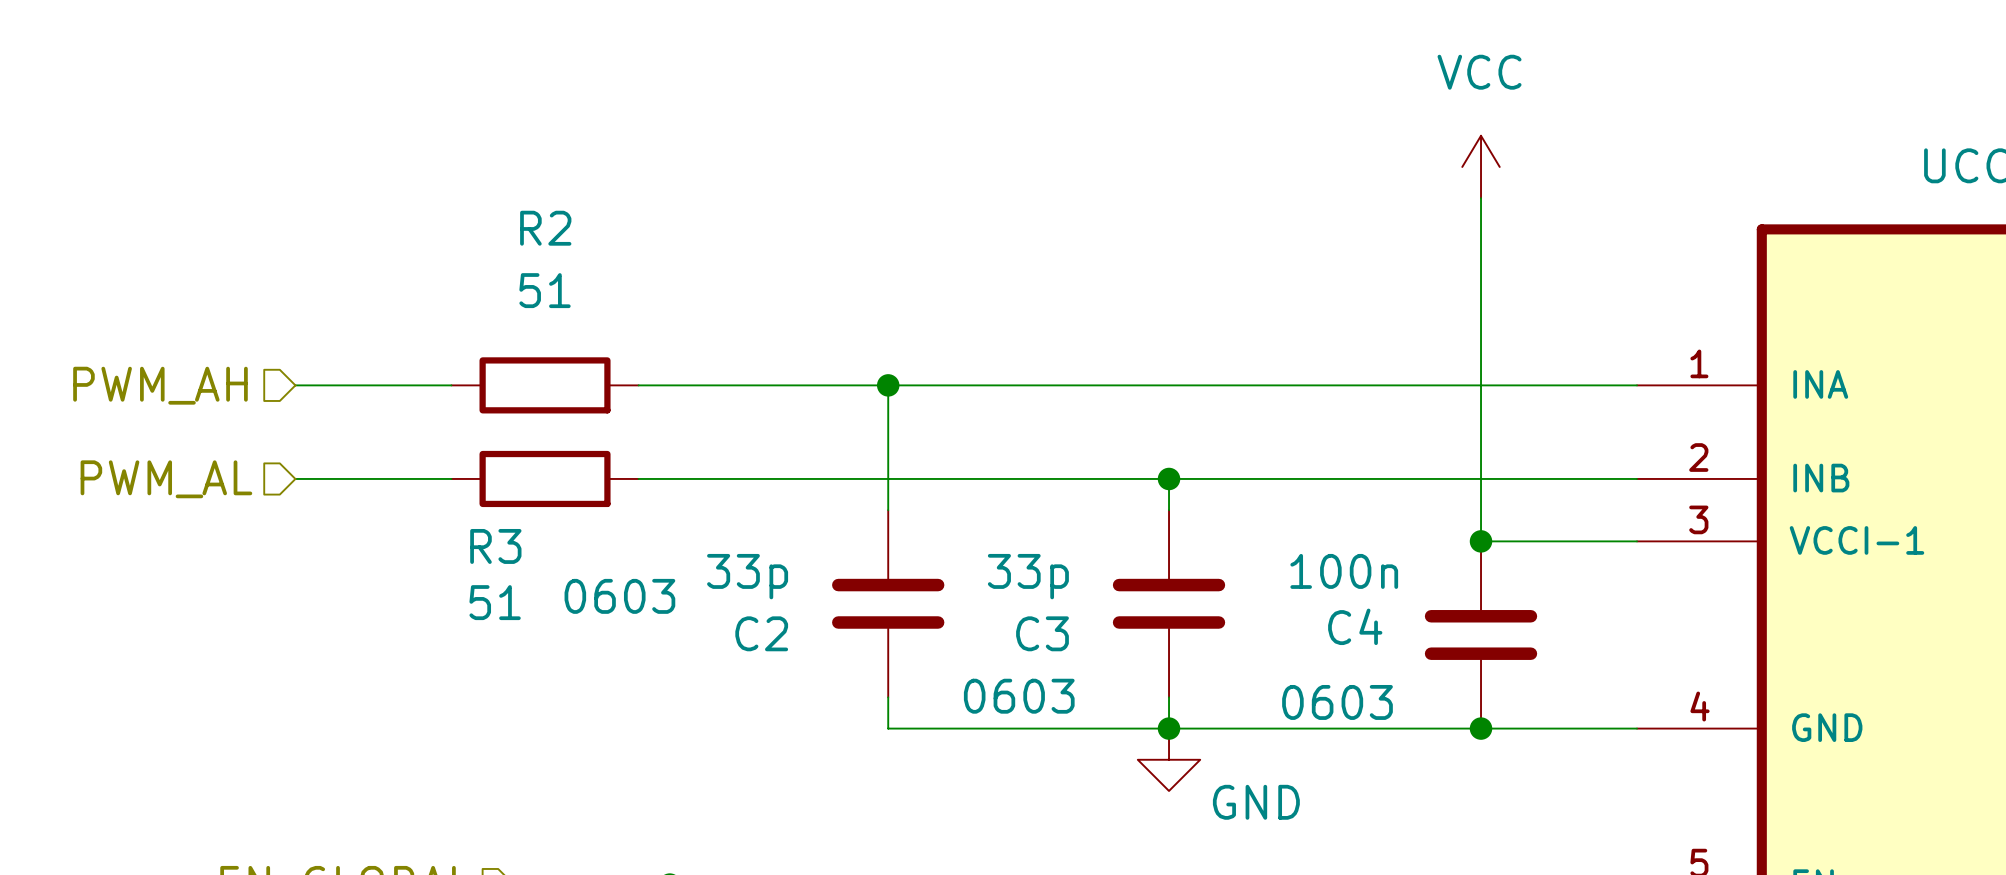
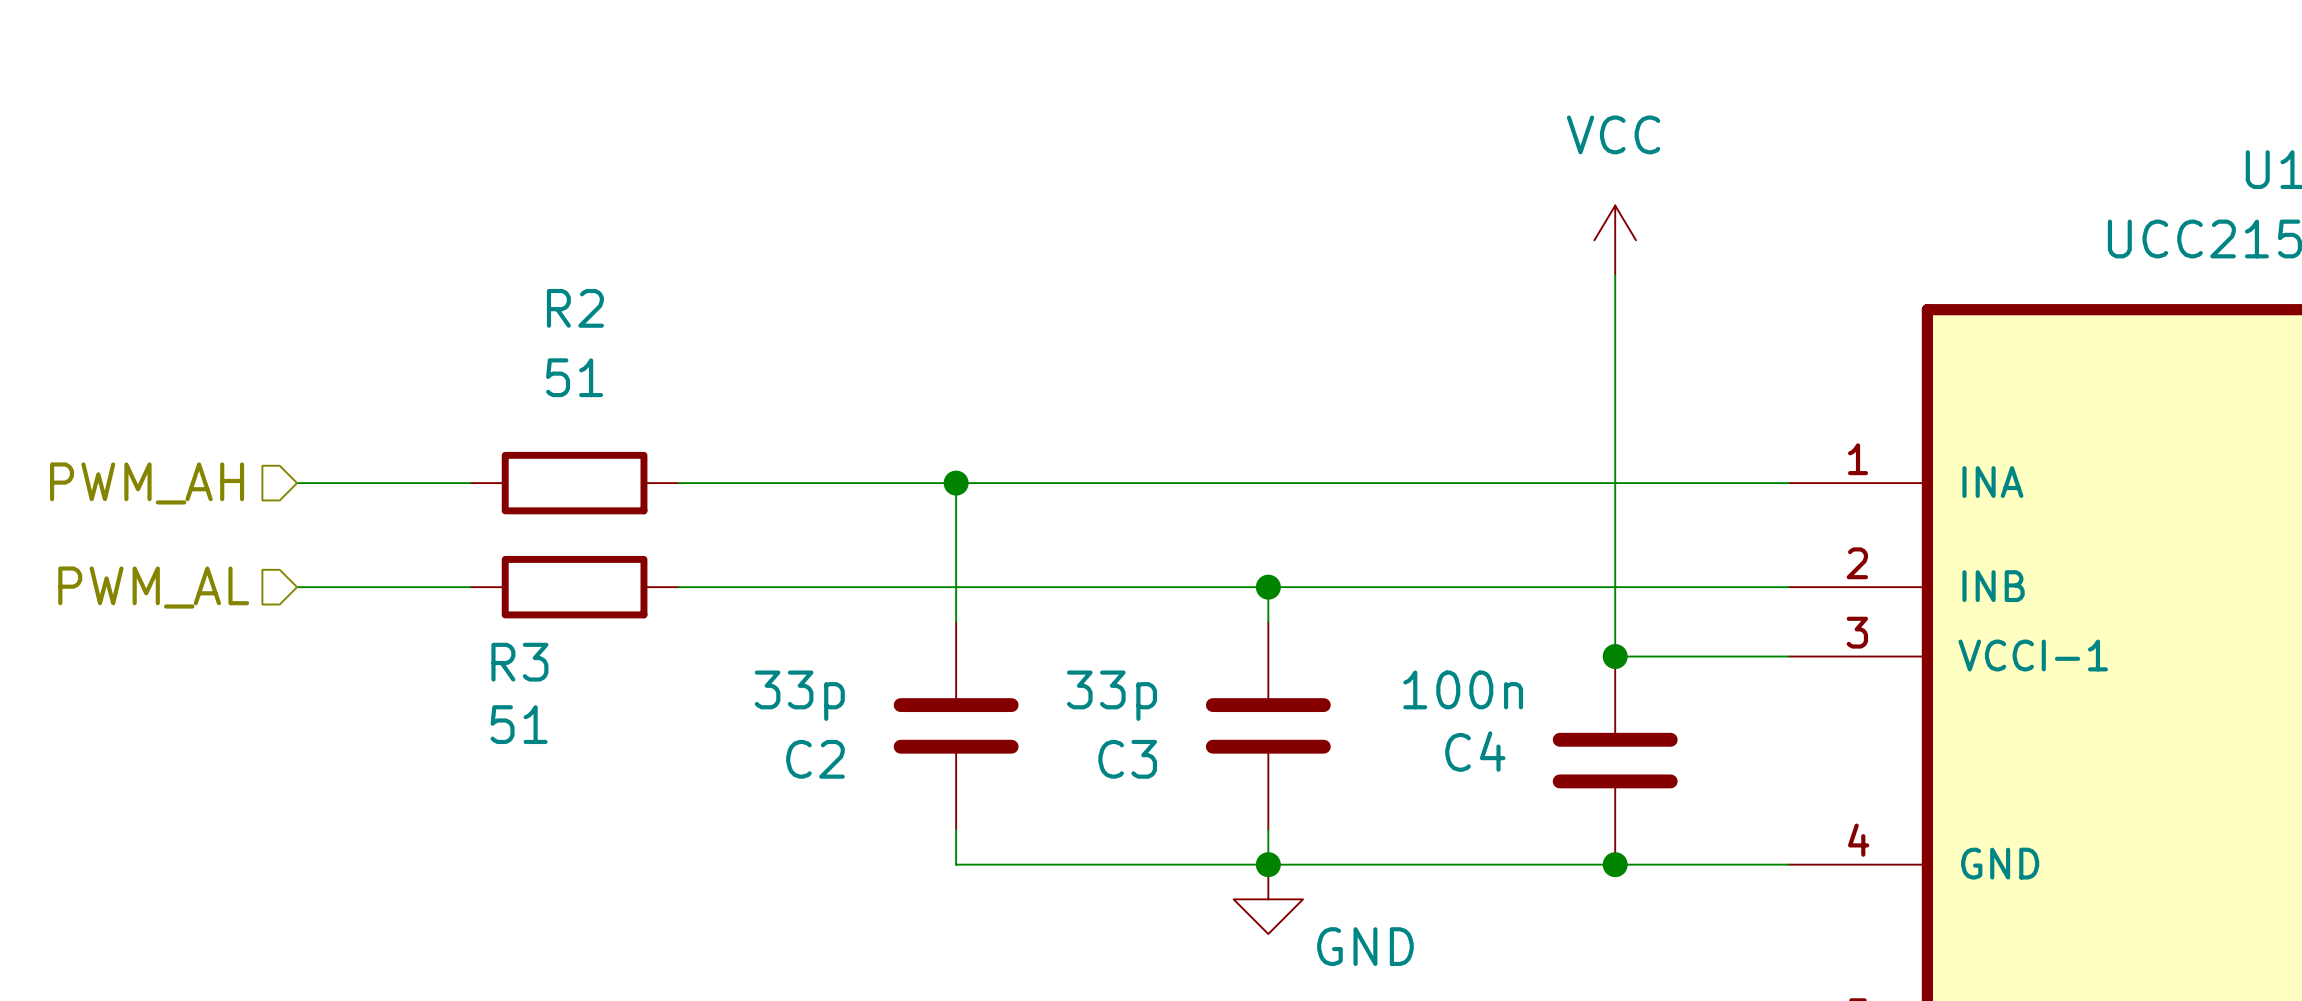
R3 text: 0603 (619, 596) -> none
C2 text: 0603 (1019, 696) -> none
C4 text: 0603 (1337, 702) -> none

